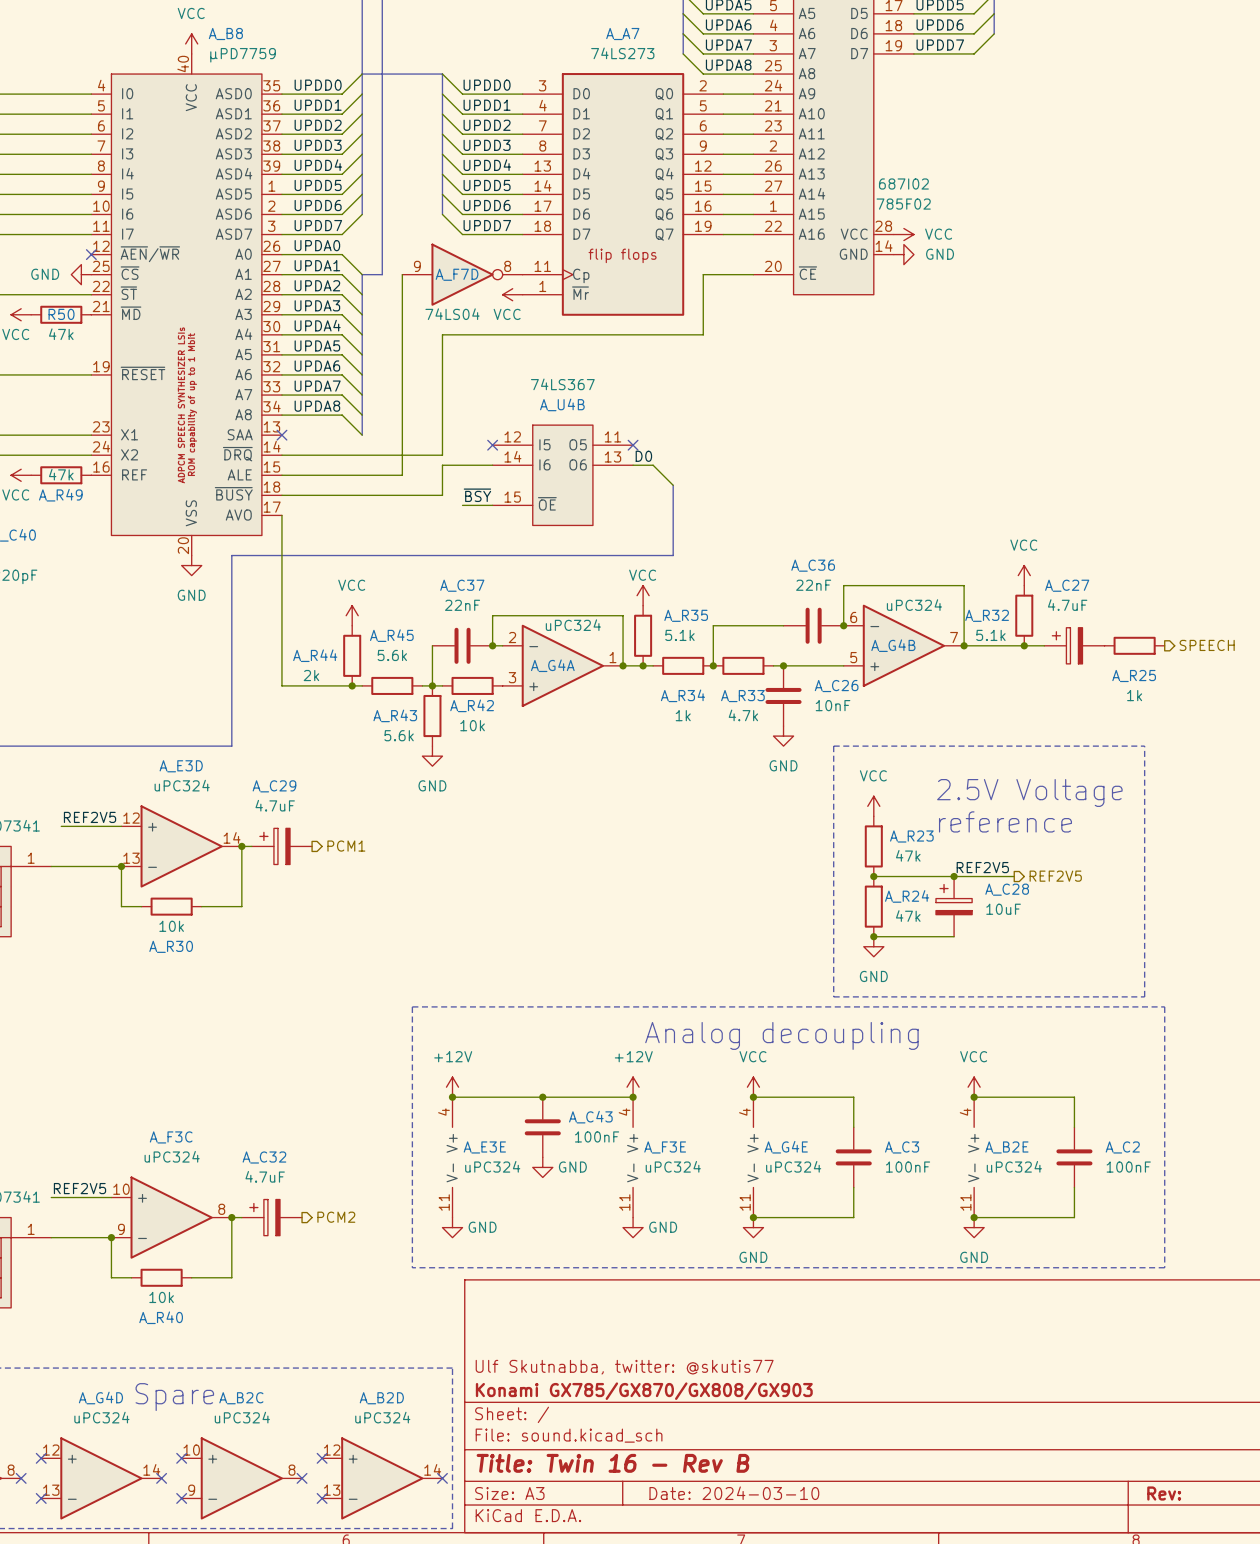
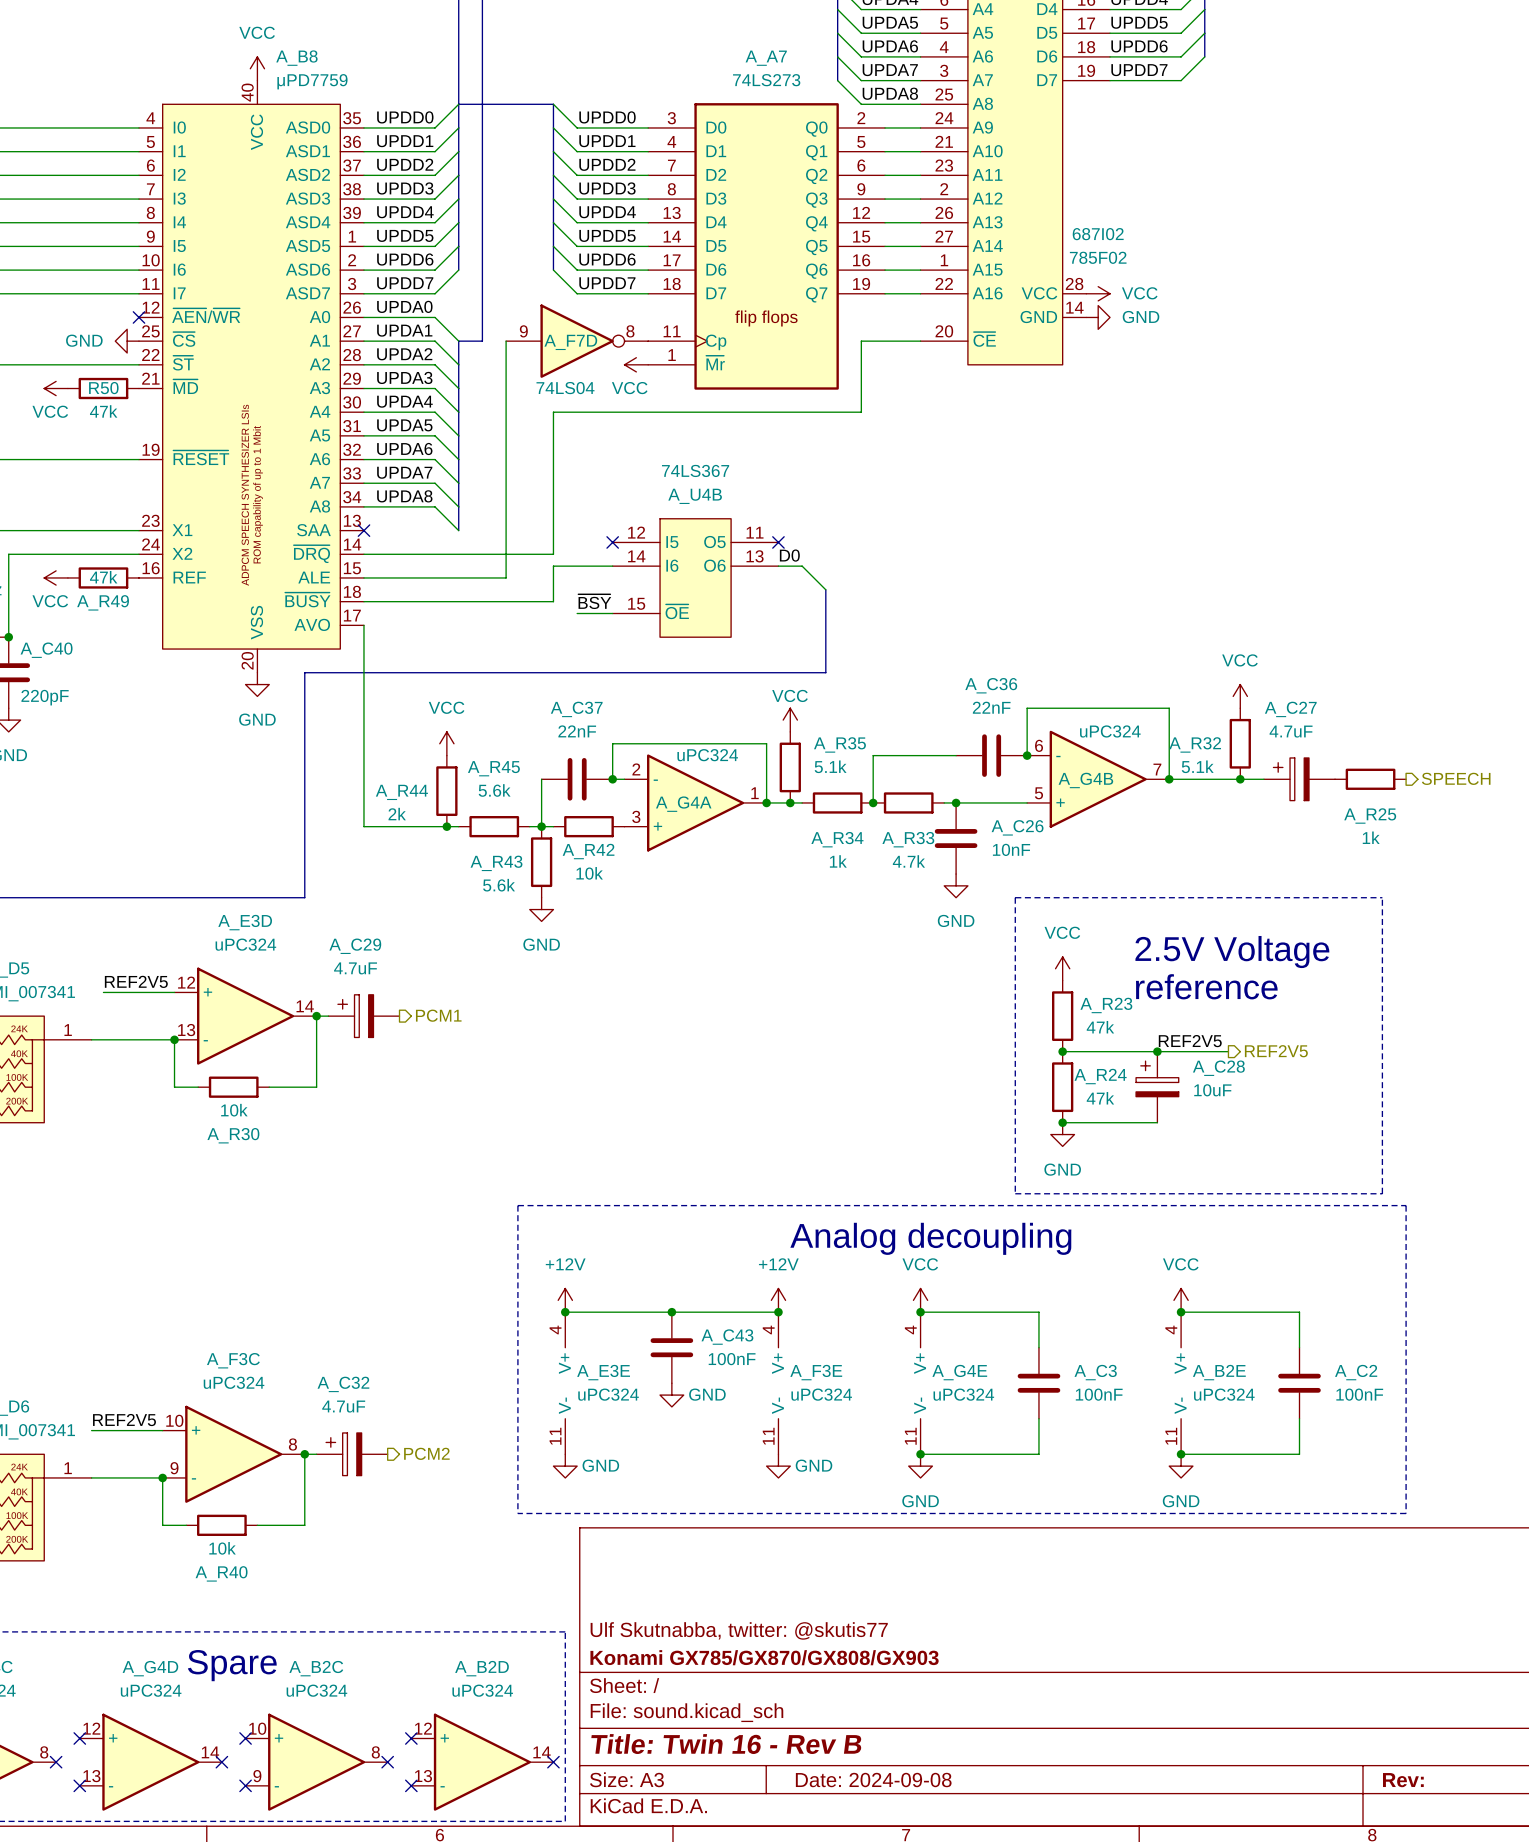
title block: Date: 2024-03-10 (734, 1493) -> Date: 2024-09-08 (873, 1780)

